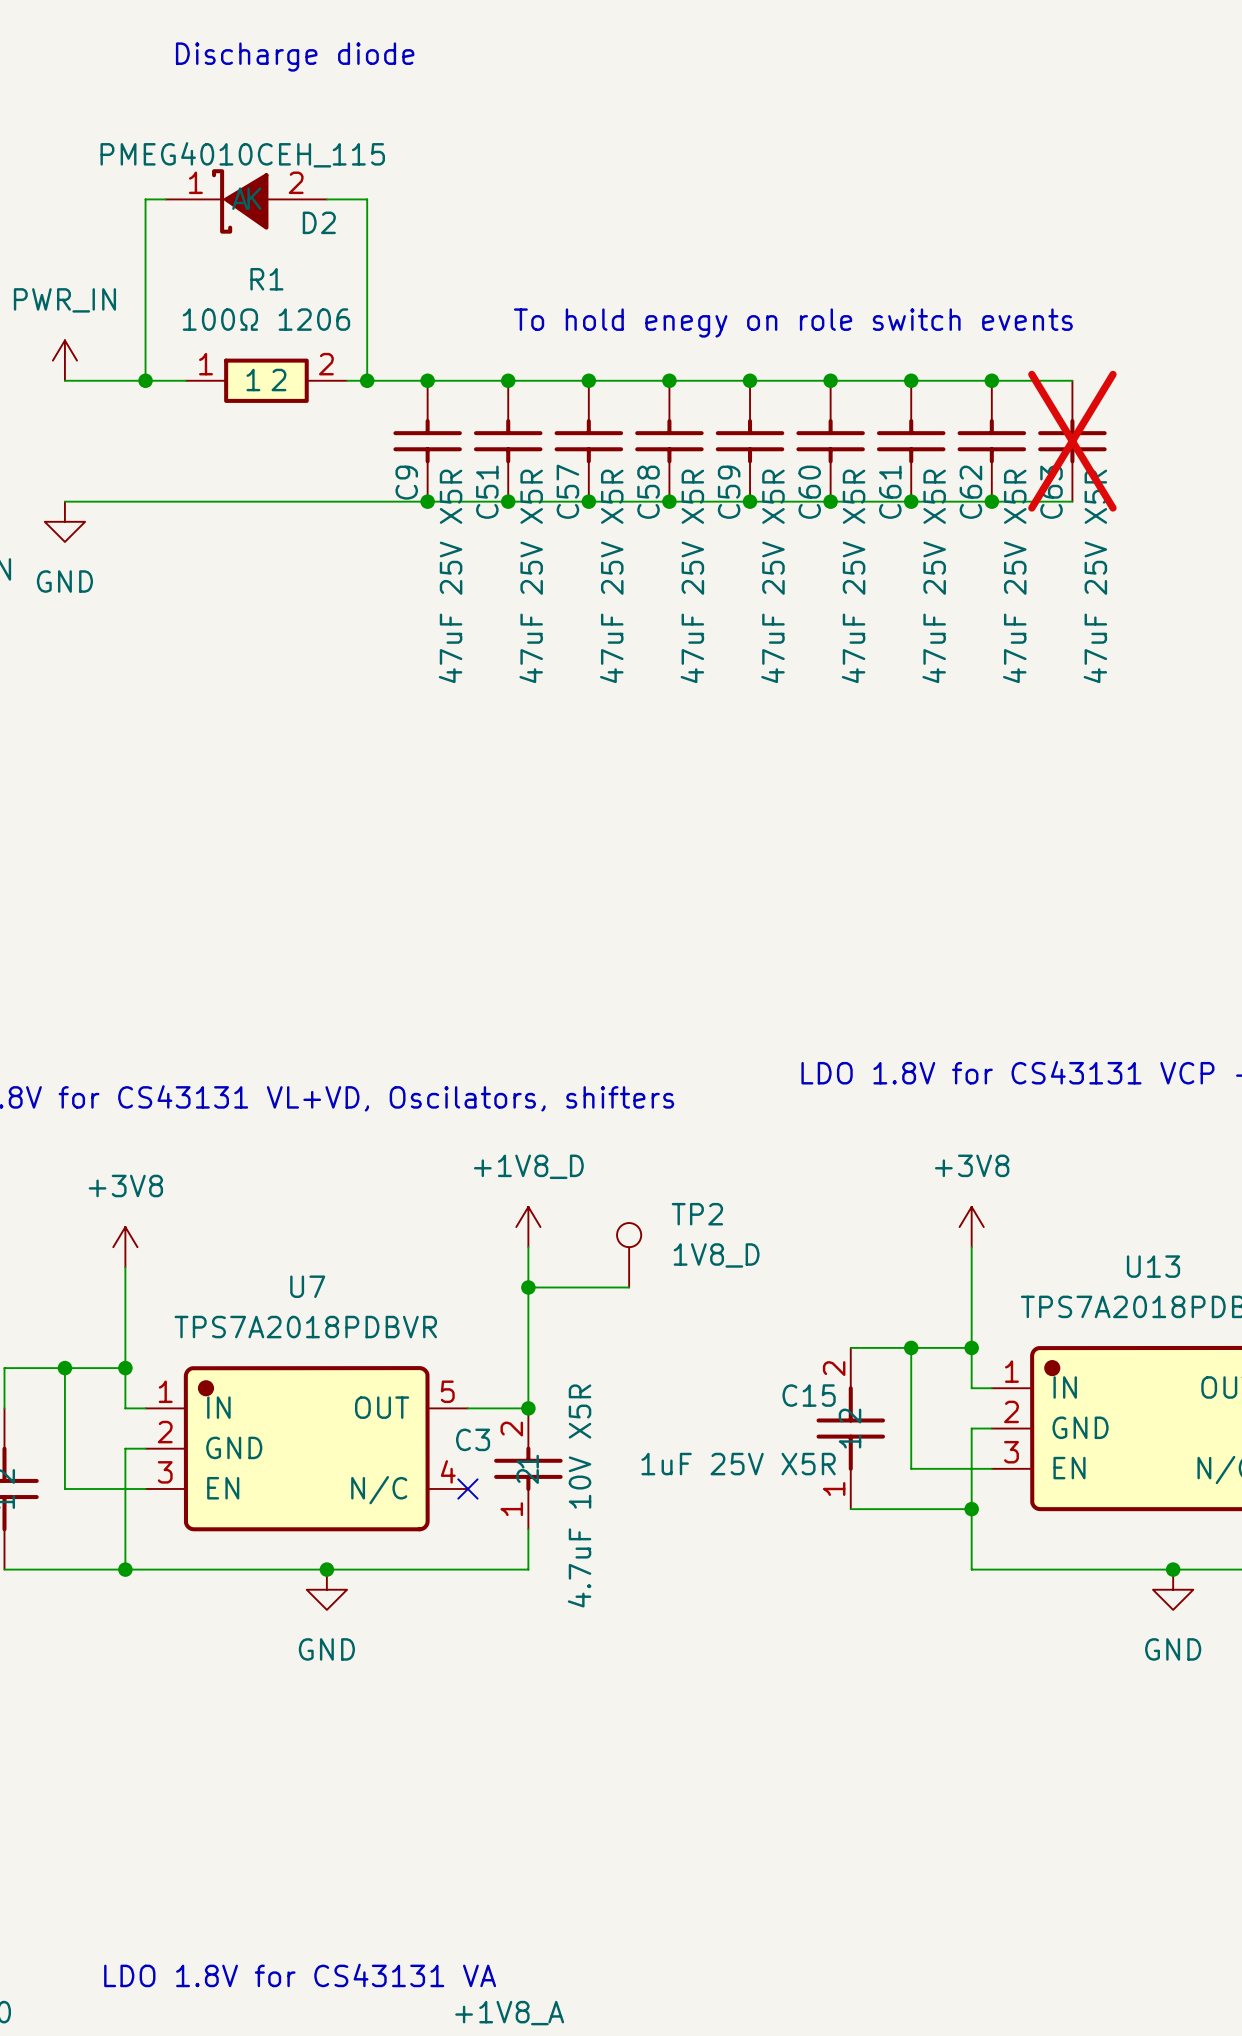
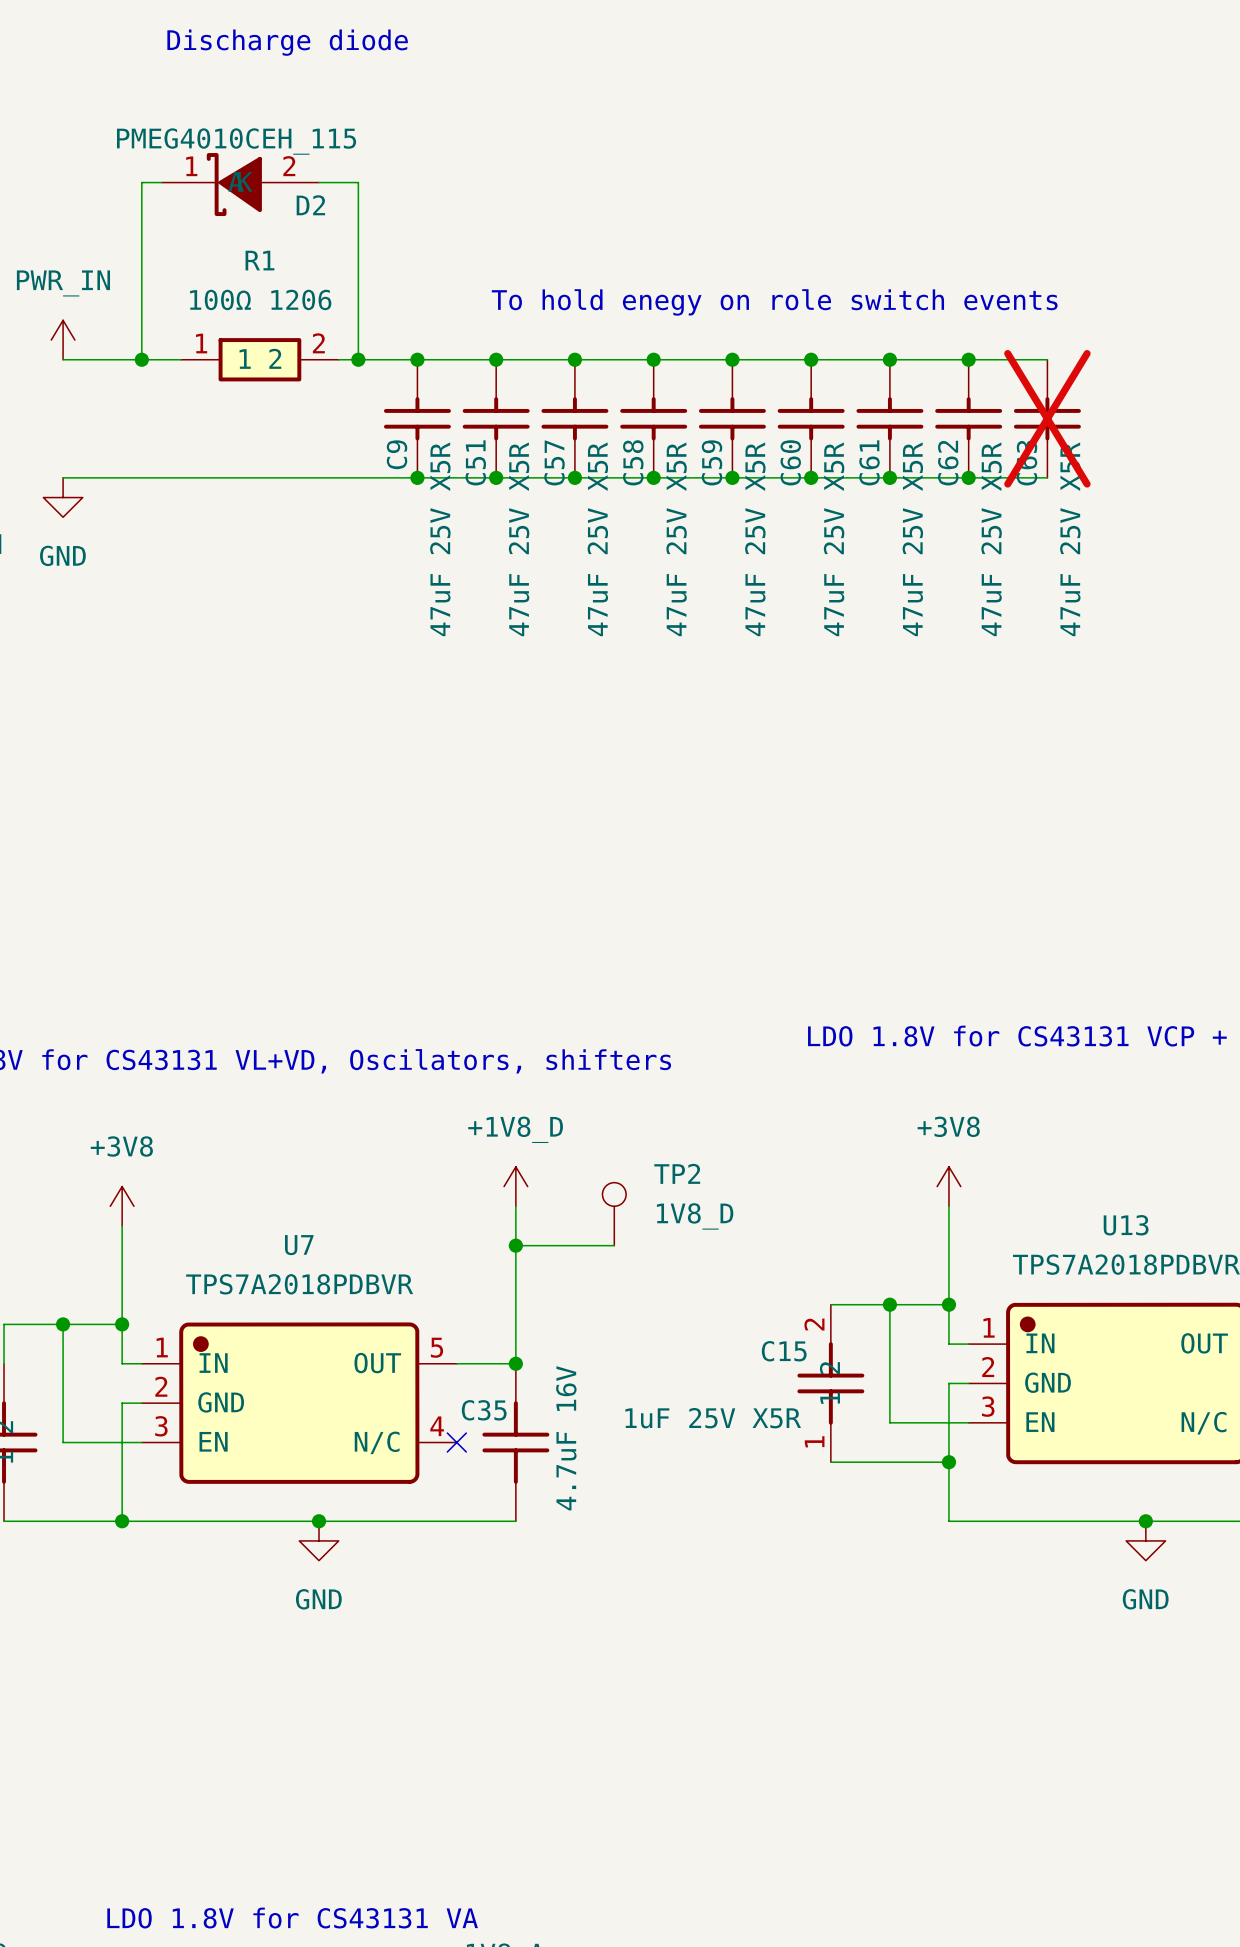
C3: 4.7uF 10V X5R (528, 1468) -> none
C35: none -> 4.7uF 16V (515, 1442)

